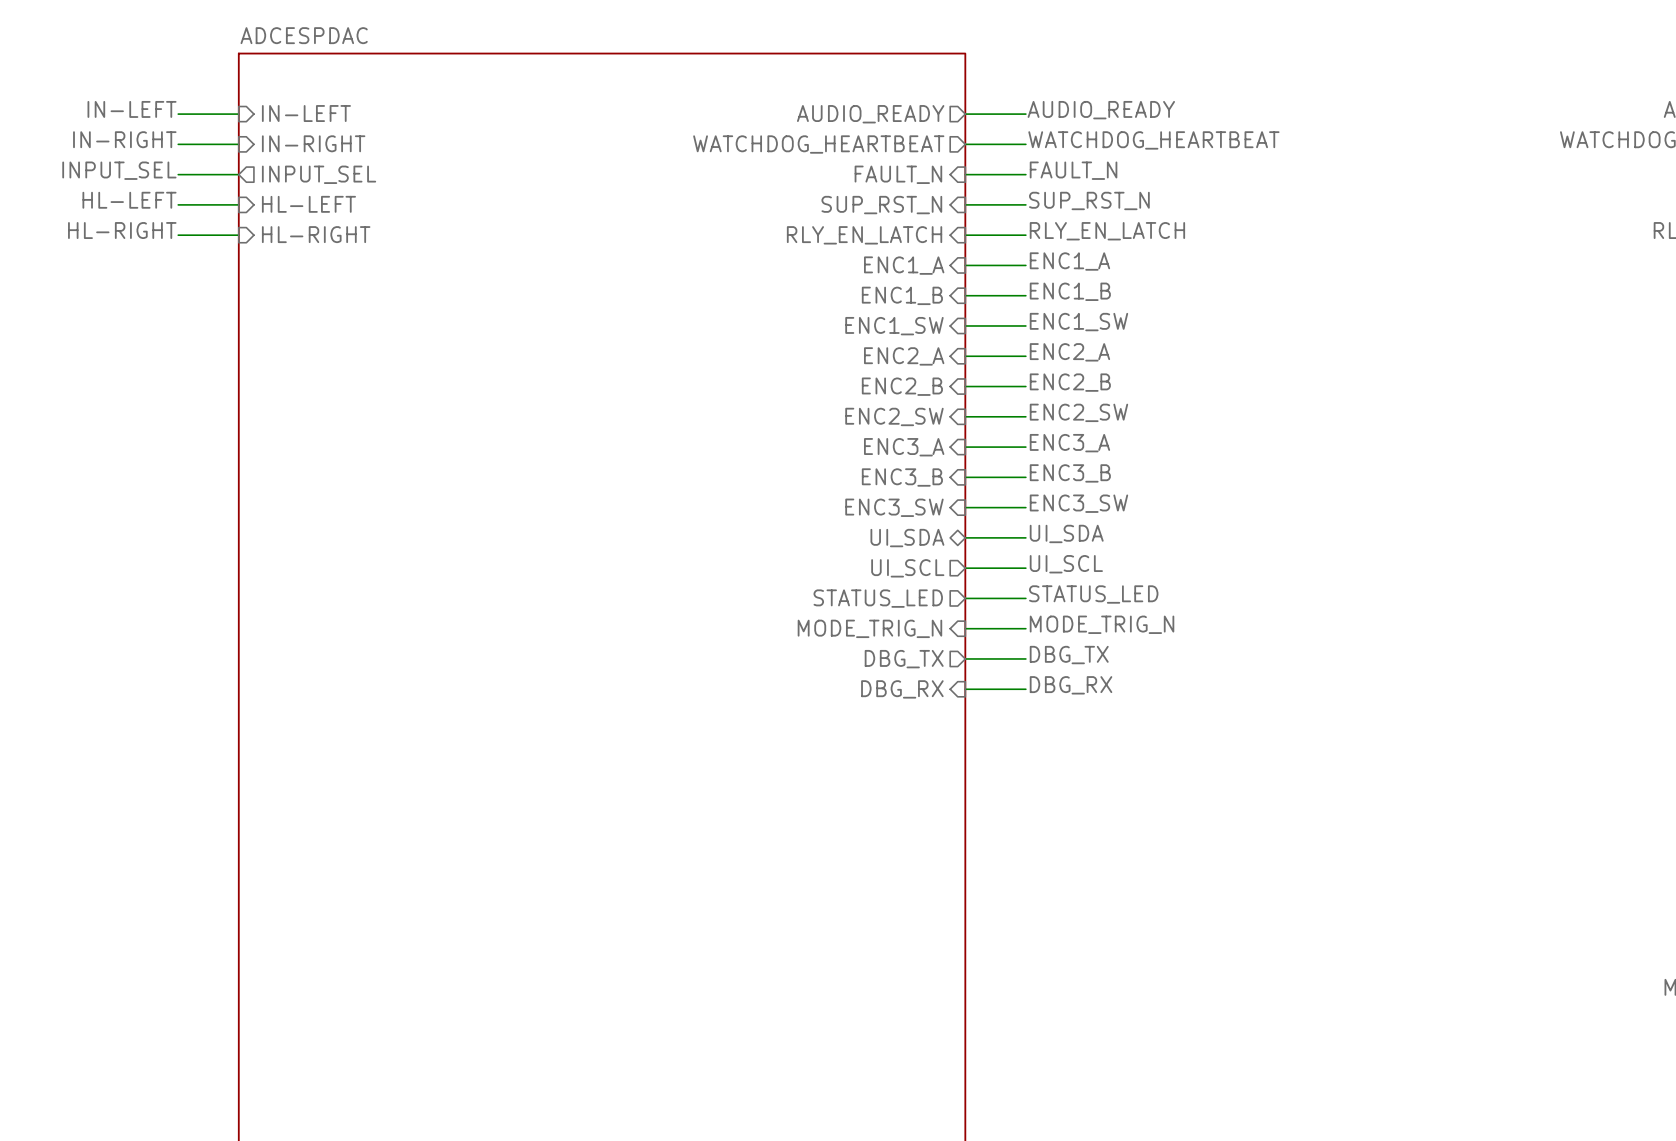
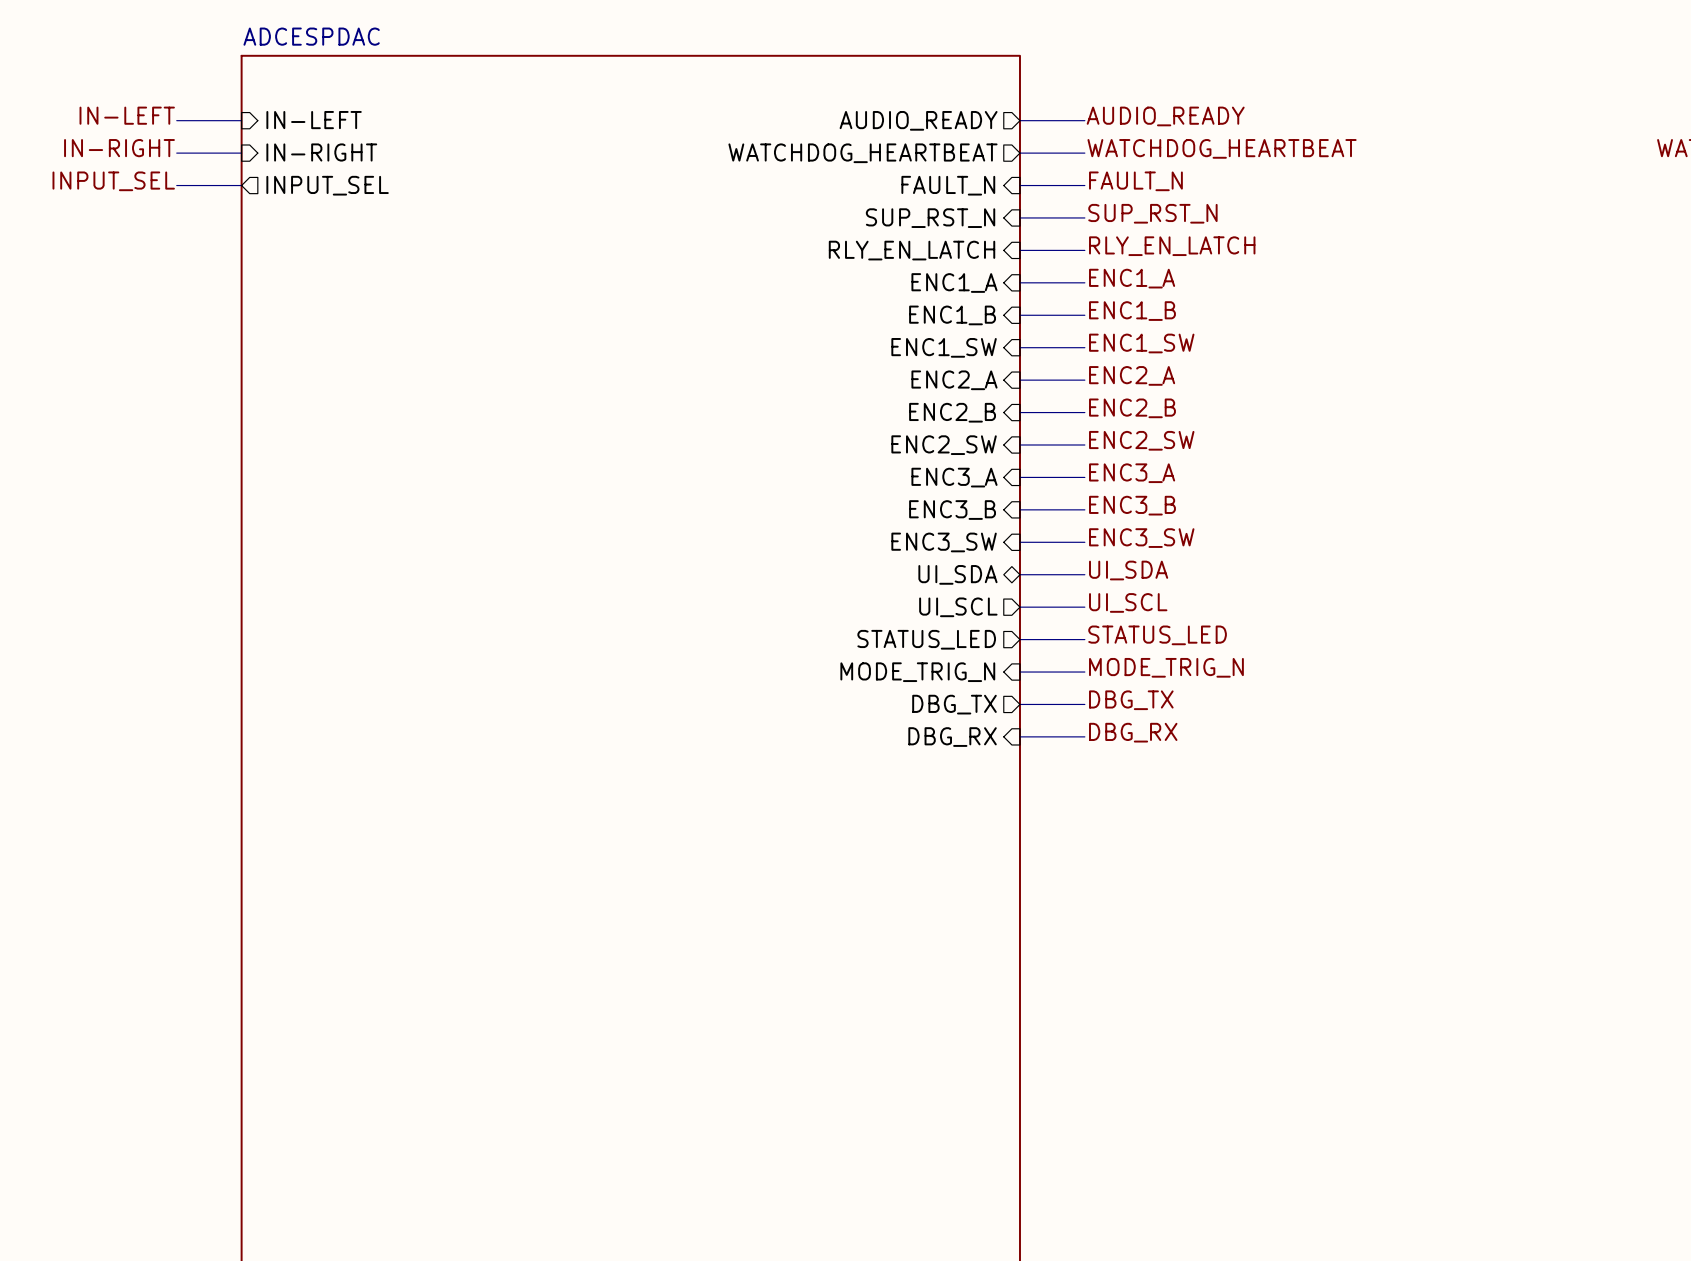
label: HL-LEFT (129, 200) -> none
wire: (178, 204) (238, 204) -> none
sheet pin: HL-LEFT (308, 204) -> none
label: HL-RIGHT (122, 230) -> none
sheet pin: HL-RIGHT (316, 234) -> none
wire: (178, 235) (238, 235) -> none

